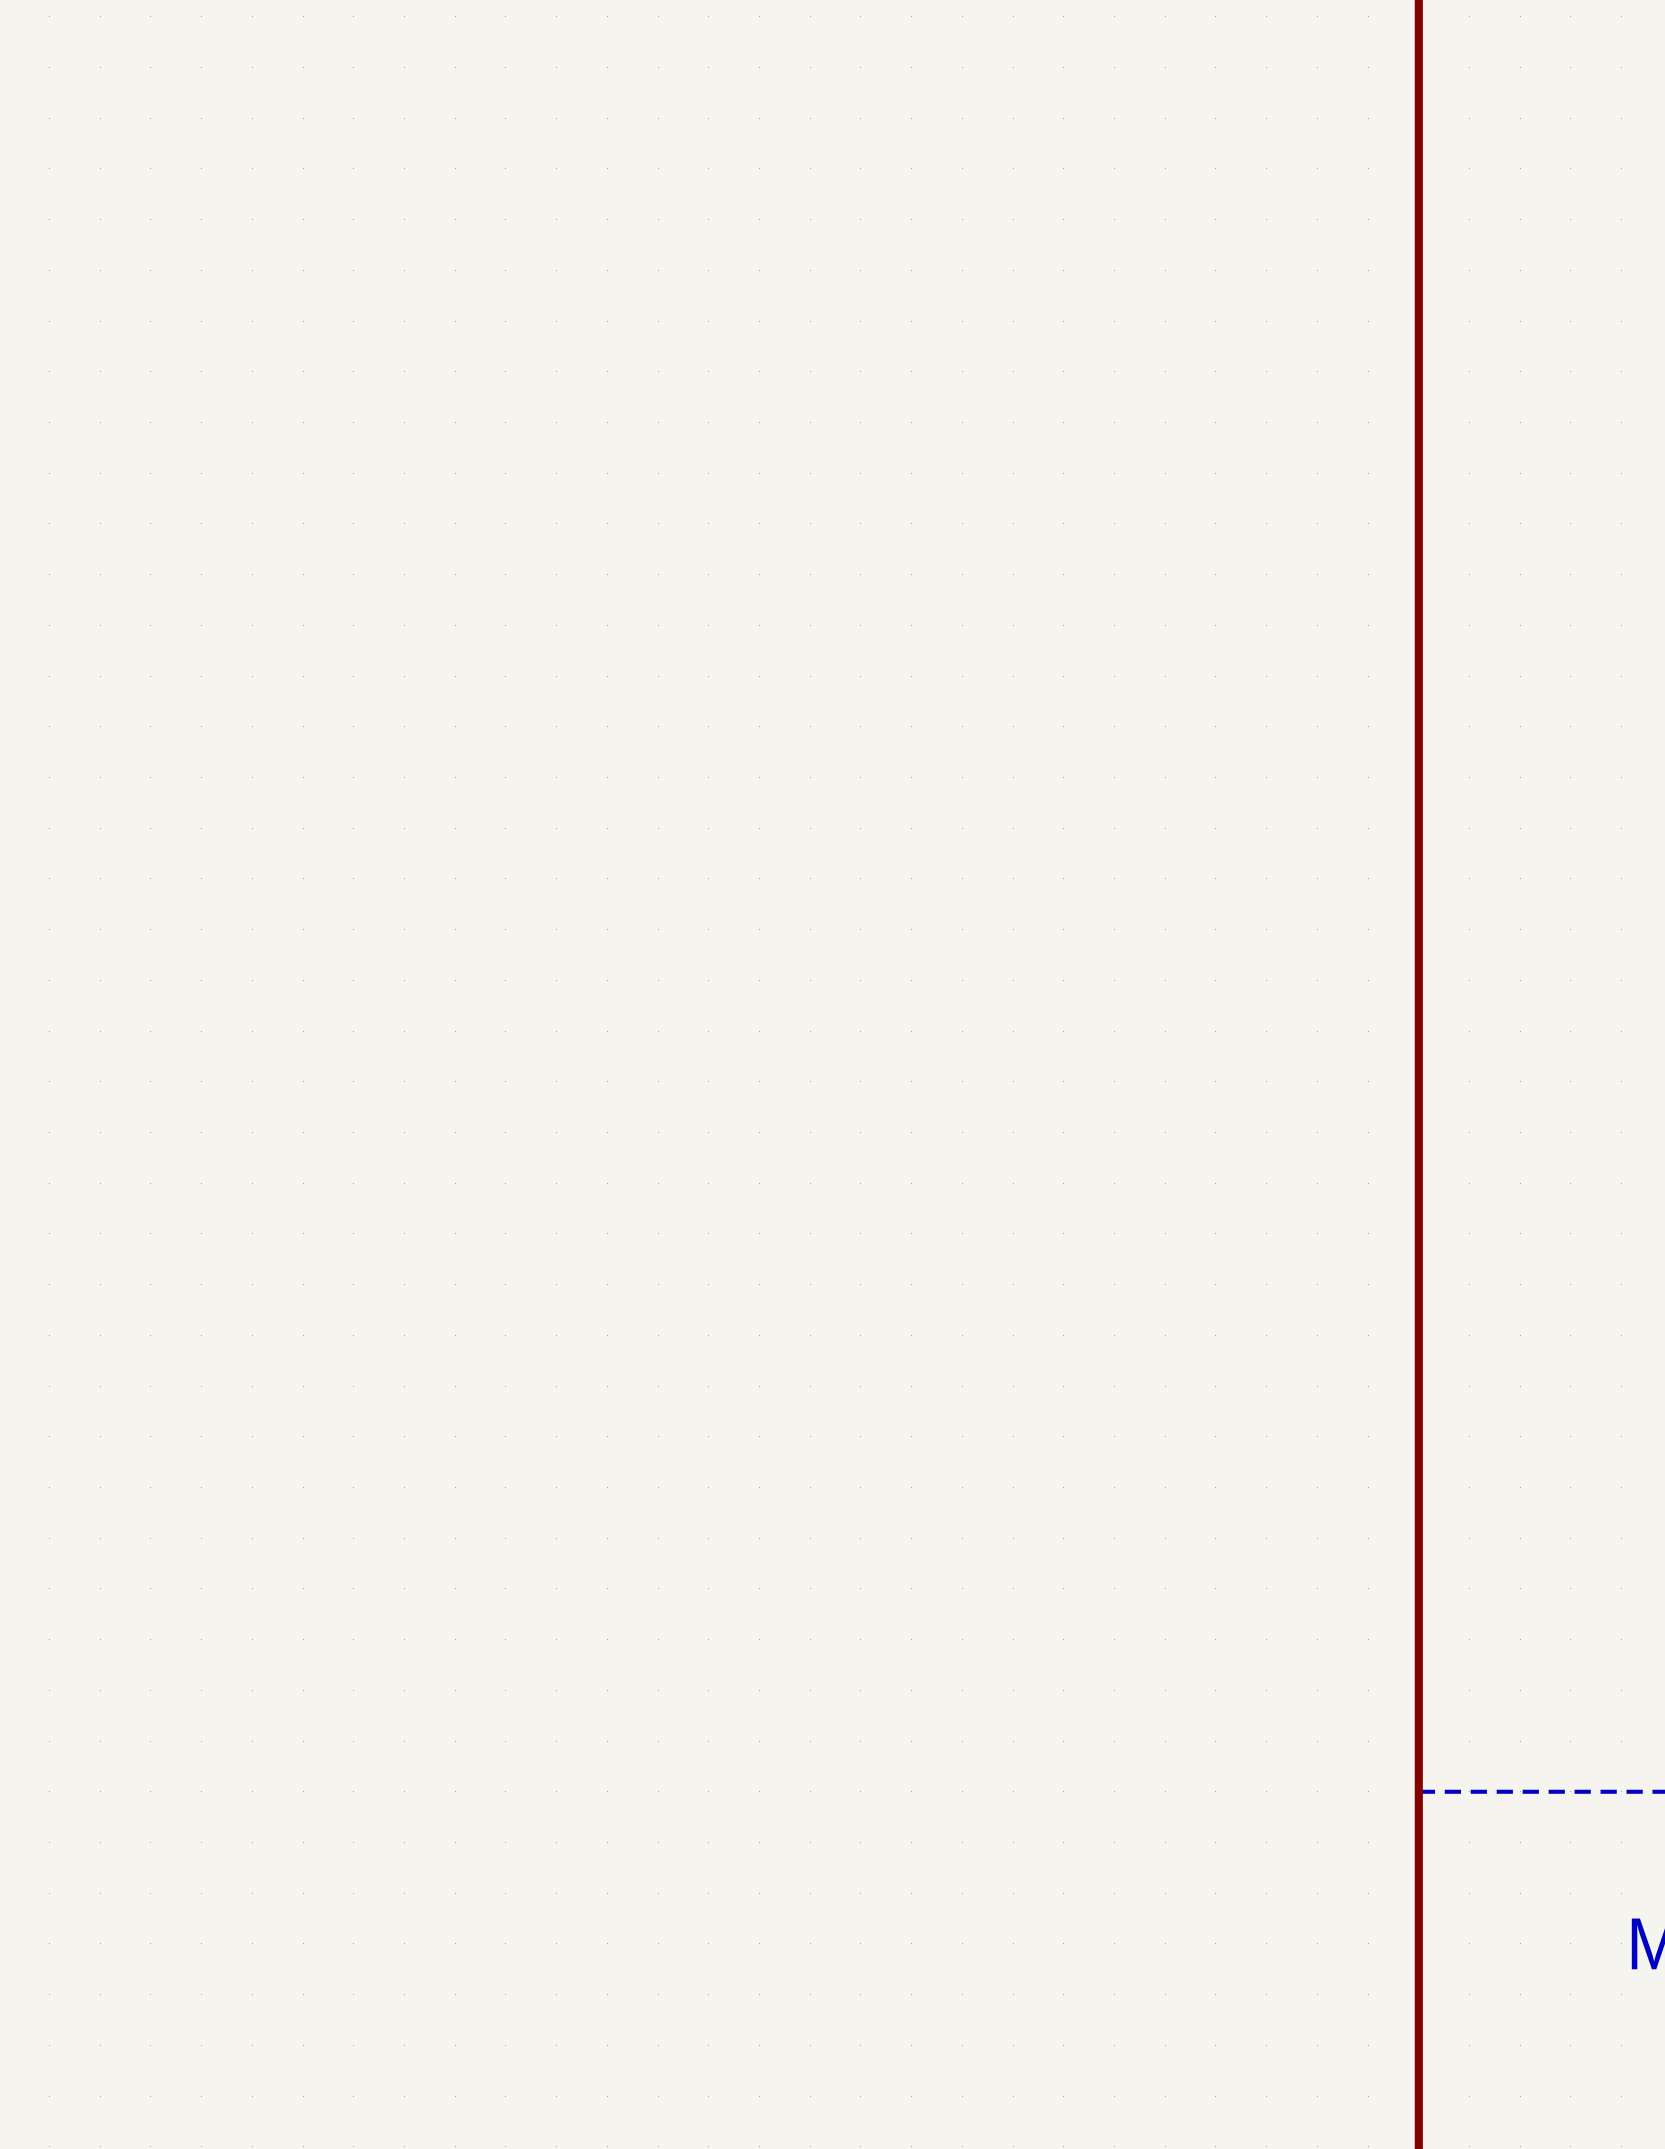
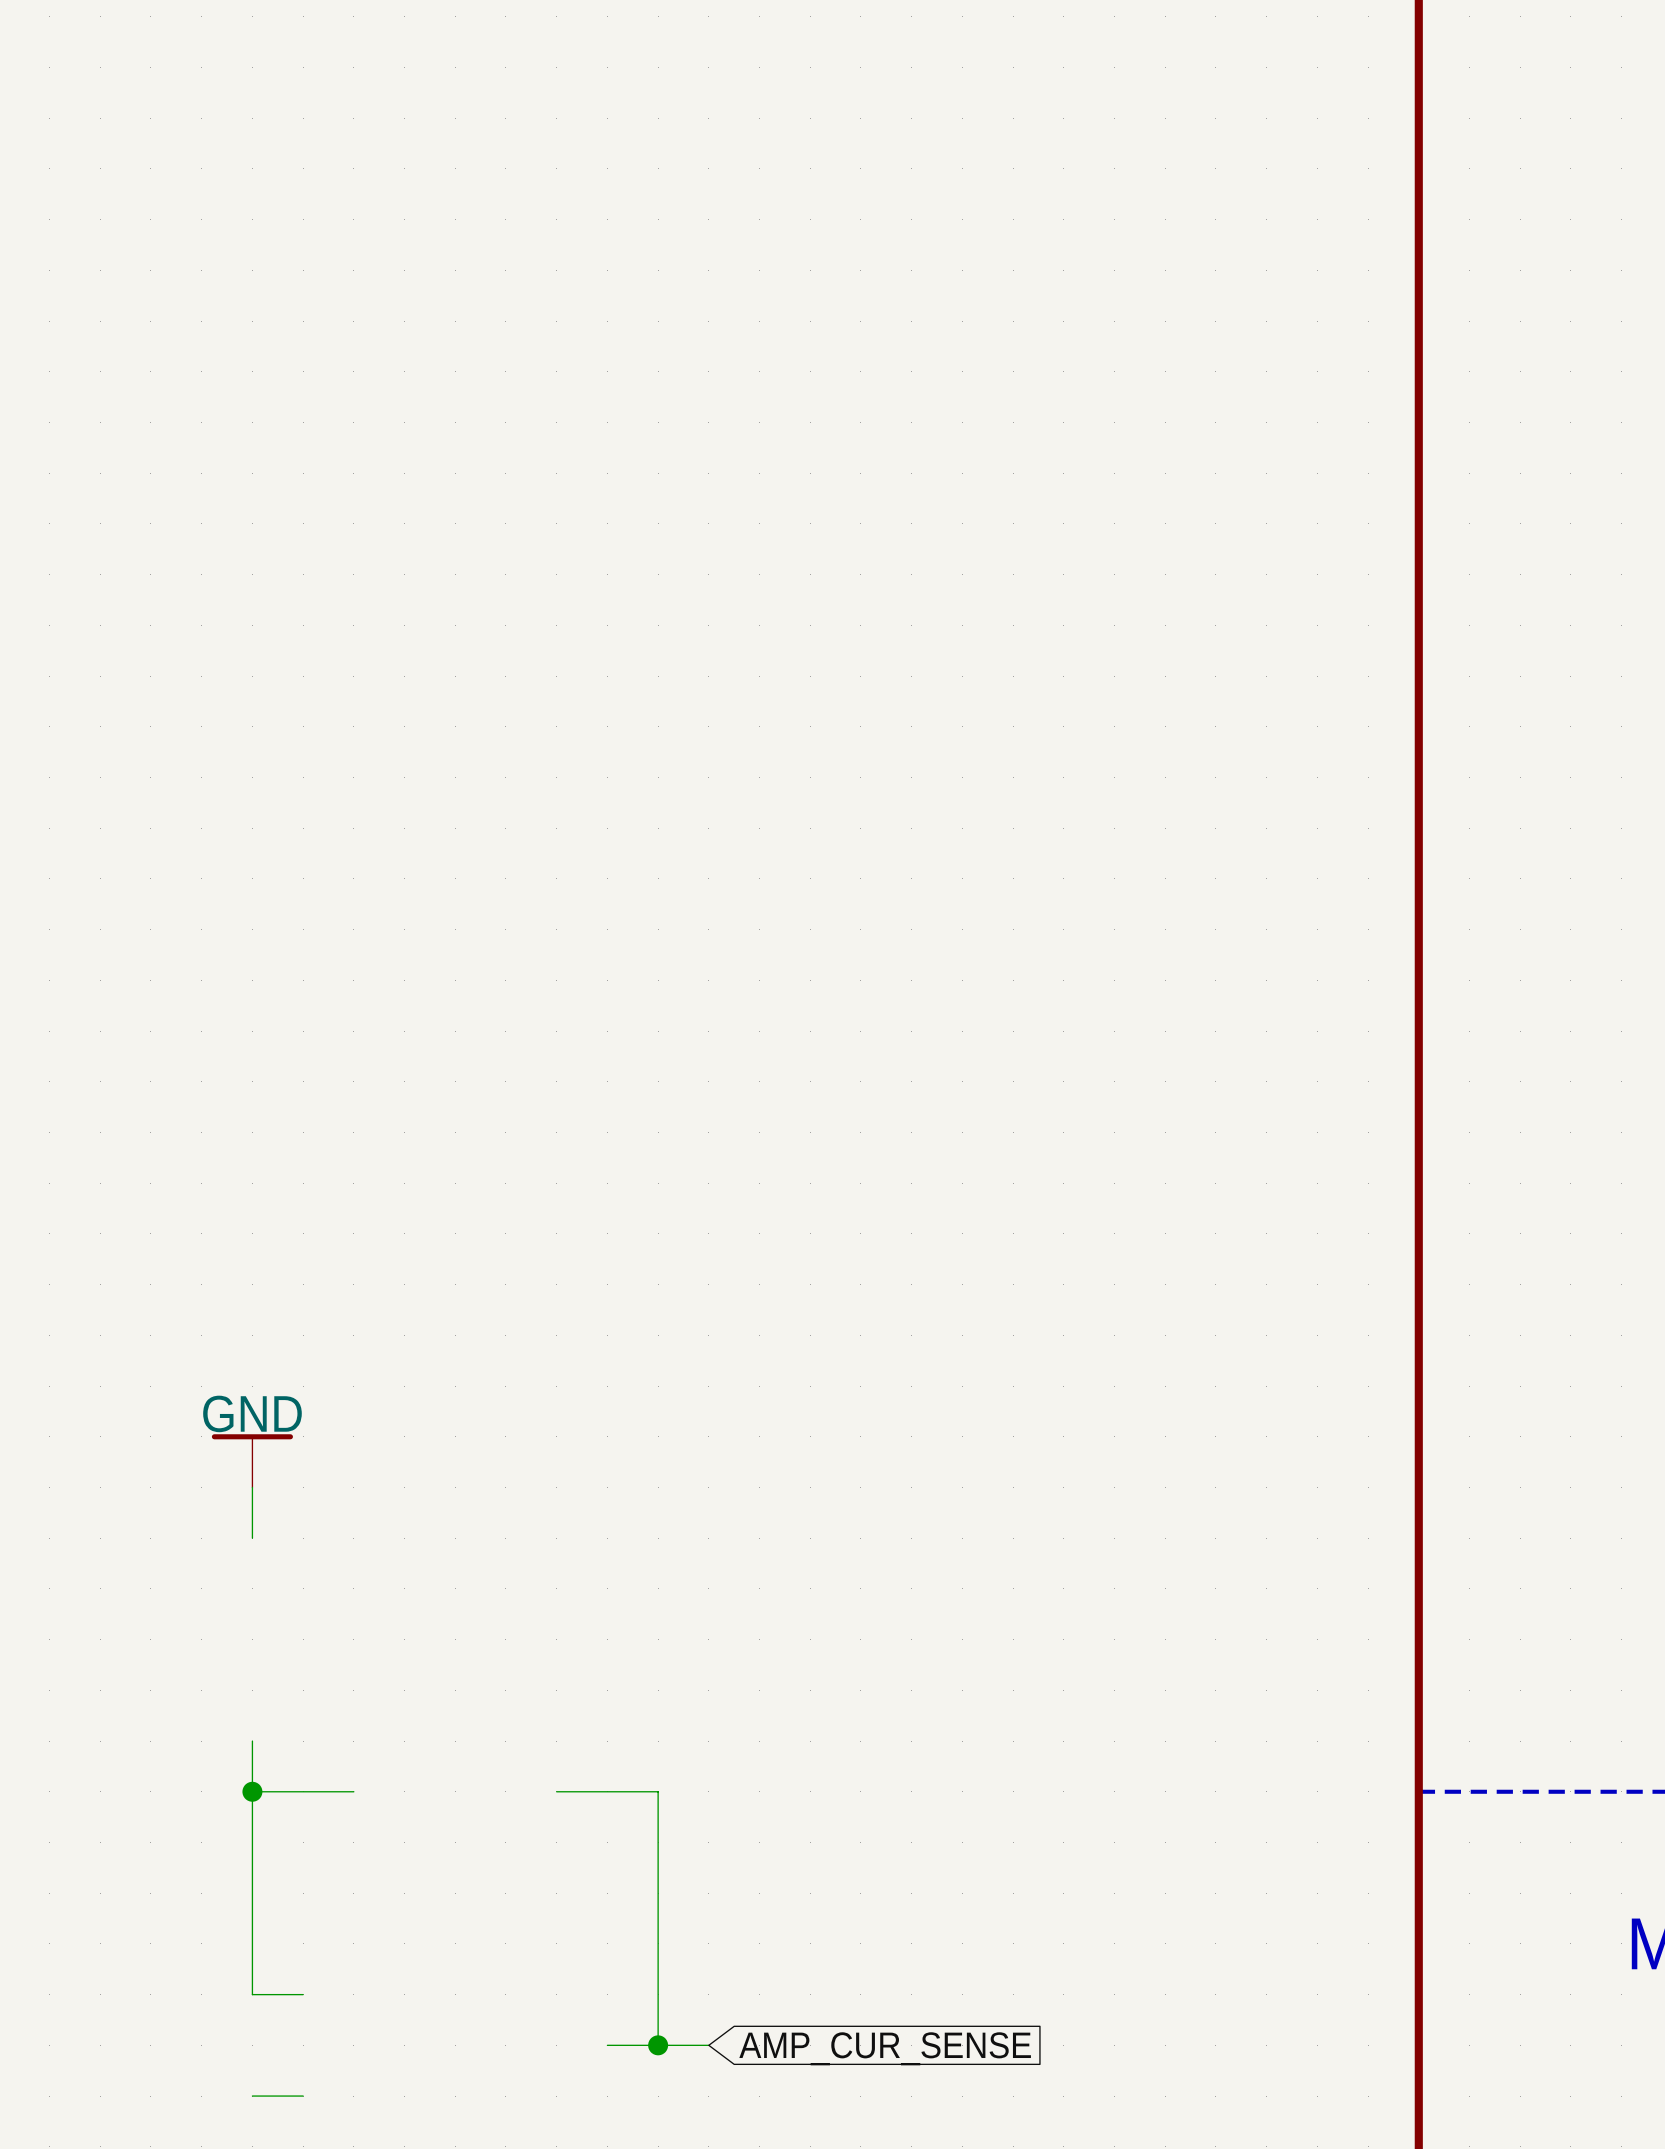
power symbol: none -> GND (252, 1460)
wire: none -> (252, 1487) (252, 1538)
wire: none -> (252, 1741) (252, 1994) (303, 1994)
wire: none -> (252, 1791) (353, 1791)
junction: none -> (252, 1791)
wire: none -> (556, 1791) (658, 1791) (658, 2045)
wire: none -> (607, 2045) (708, 2045)
junction: none -> (658, 2045)
global label: none -> AMP_CUR_SENSE (885, 2048)
wire: none -> (252, 2096) (303, 2096)

